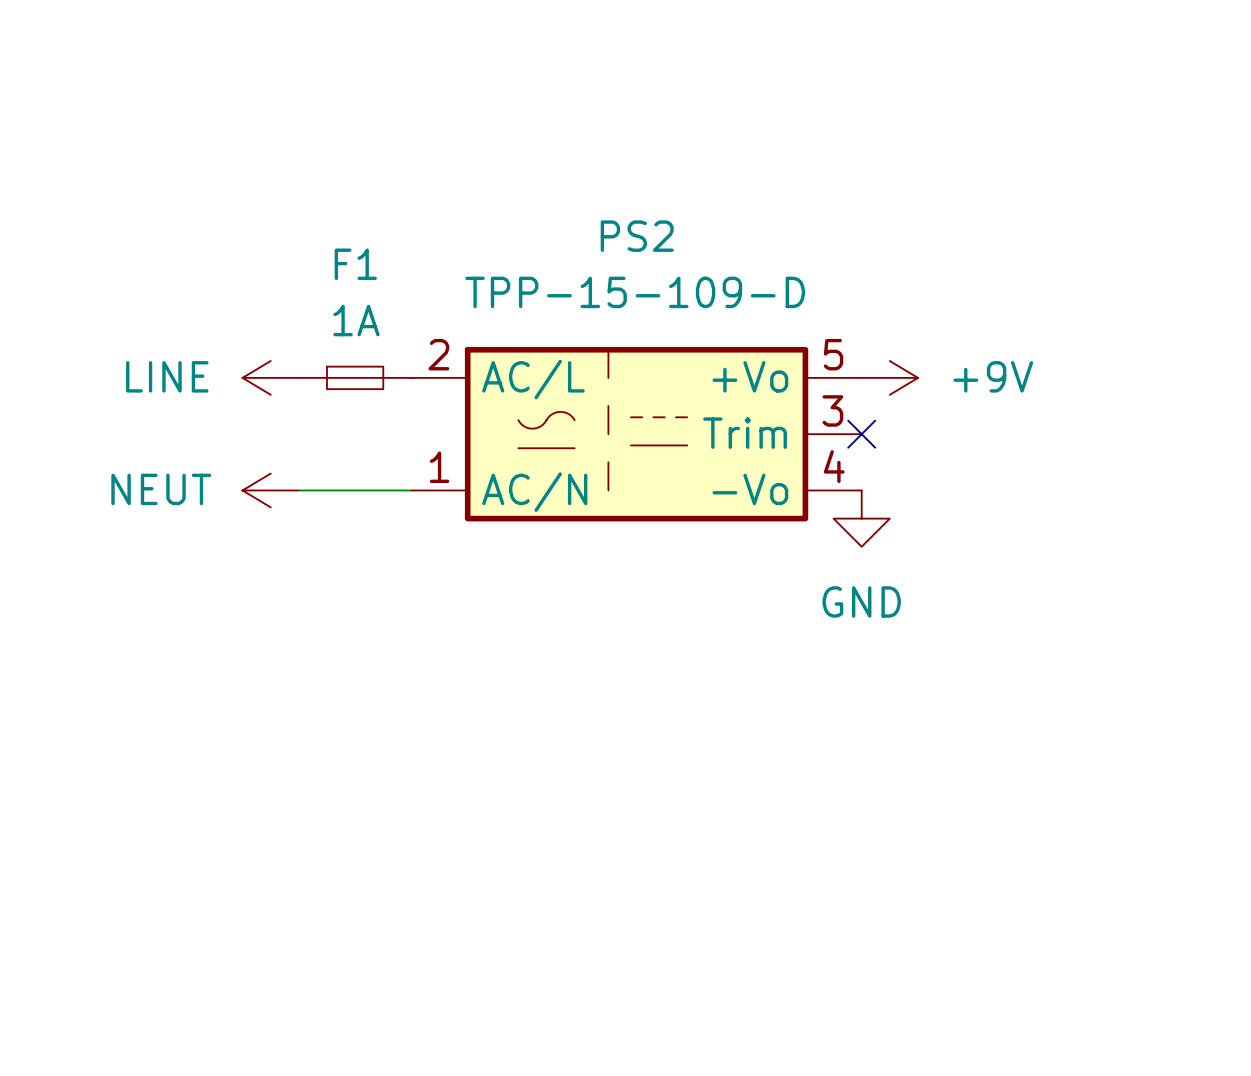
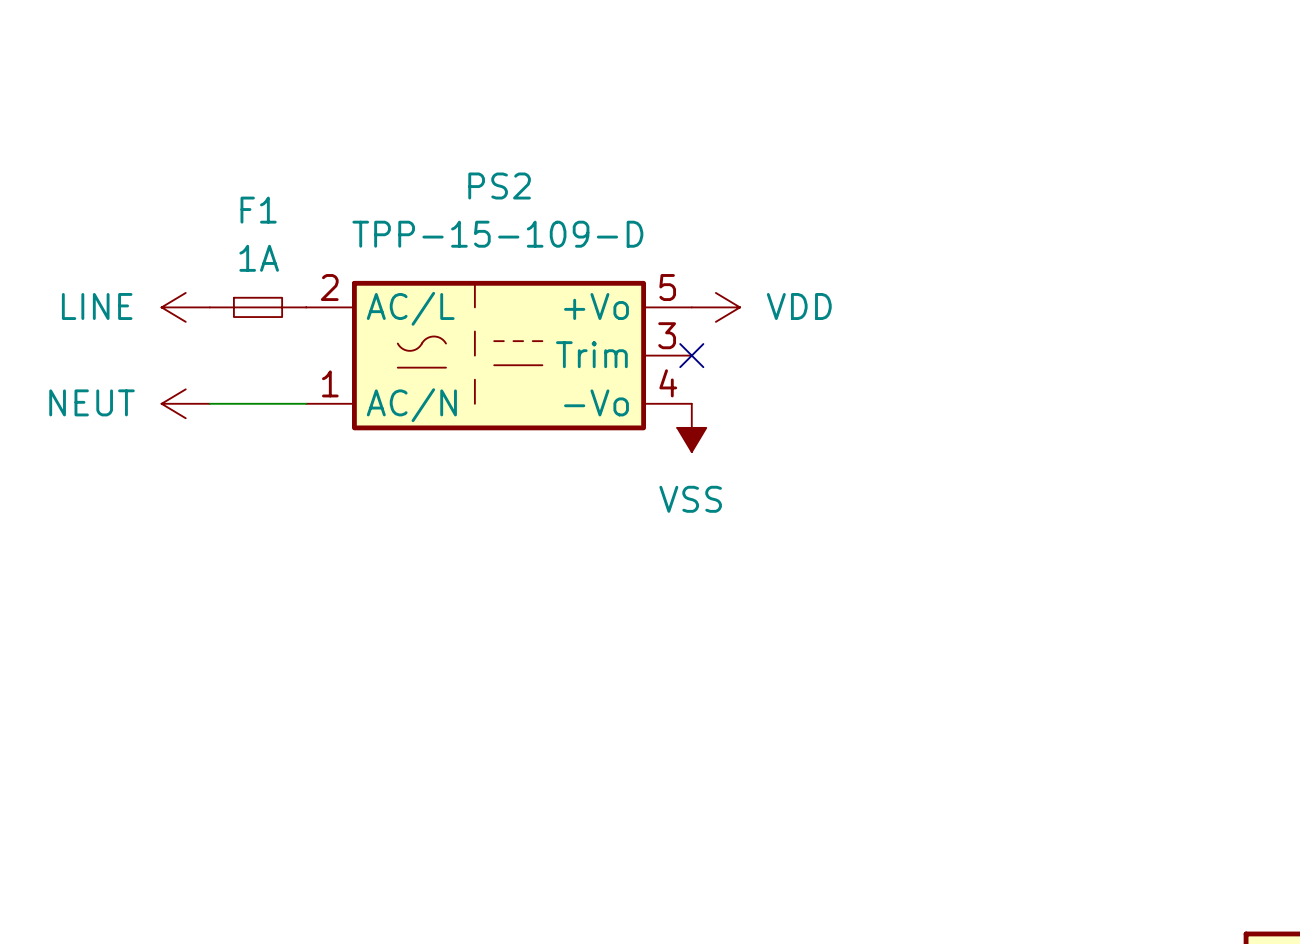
power symbol: +9V (889, 377) -> VDD (715, 307)
power symbol: GND (861, 518) -> VSS (691, 427)

